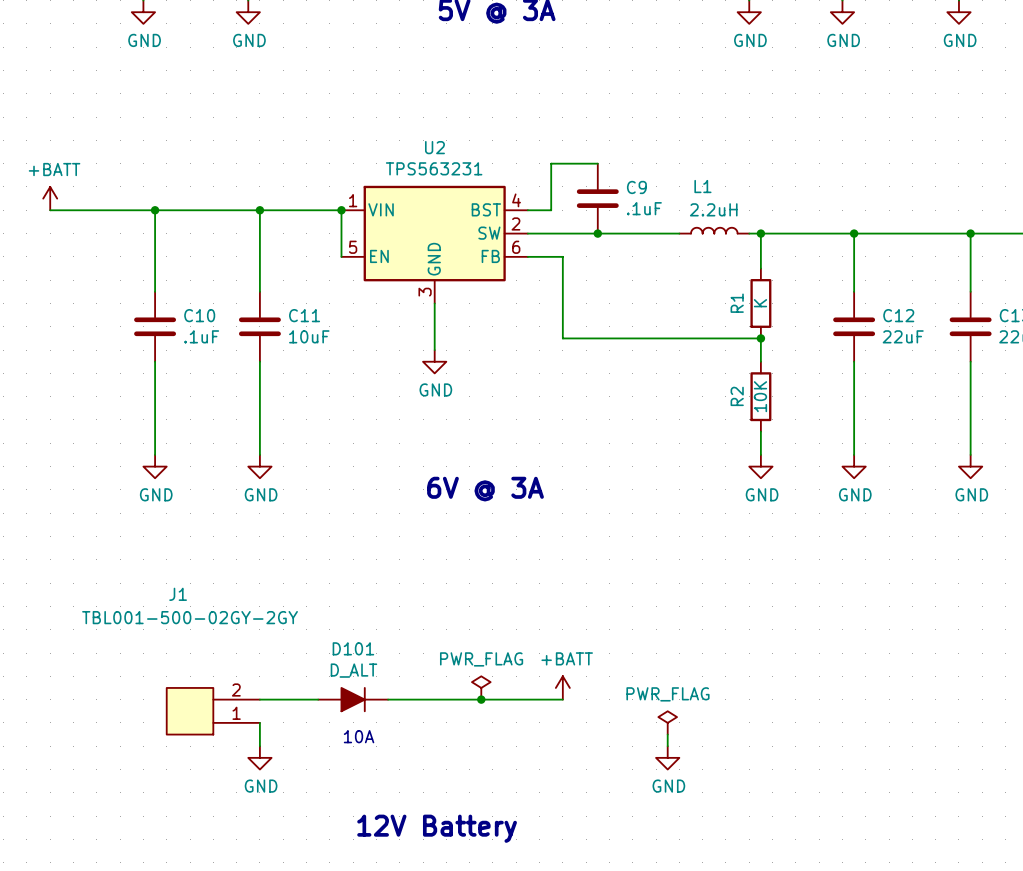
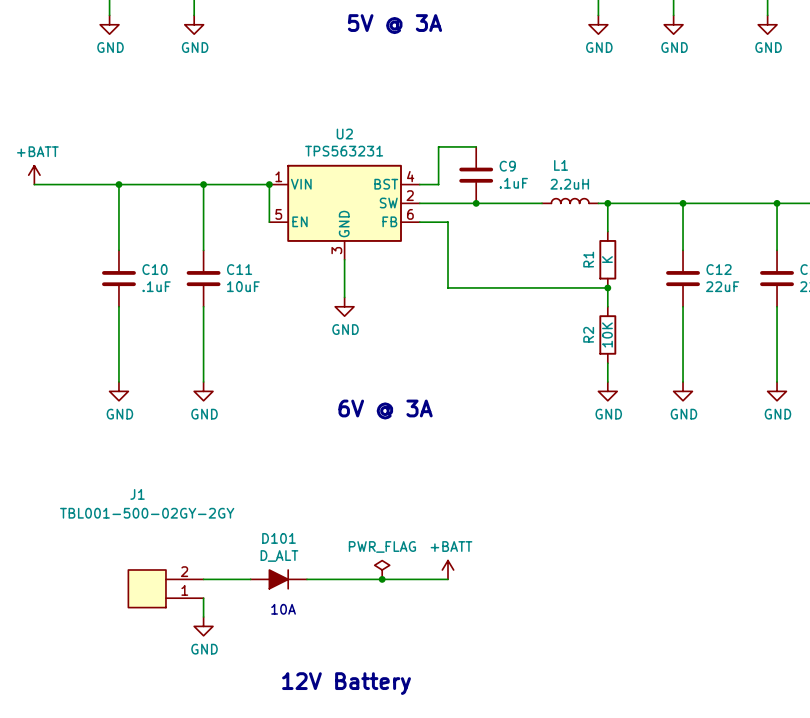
power symbol: PWR_FLAG (667, 722) -> none
wire: (667, 734) (667, 746) -> none
power symbol: GND (667, 757) -> none

